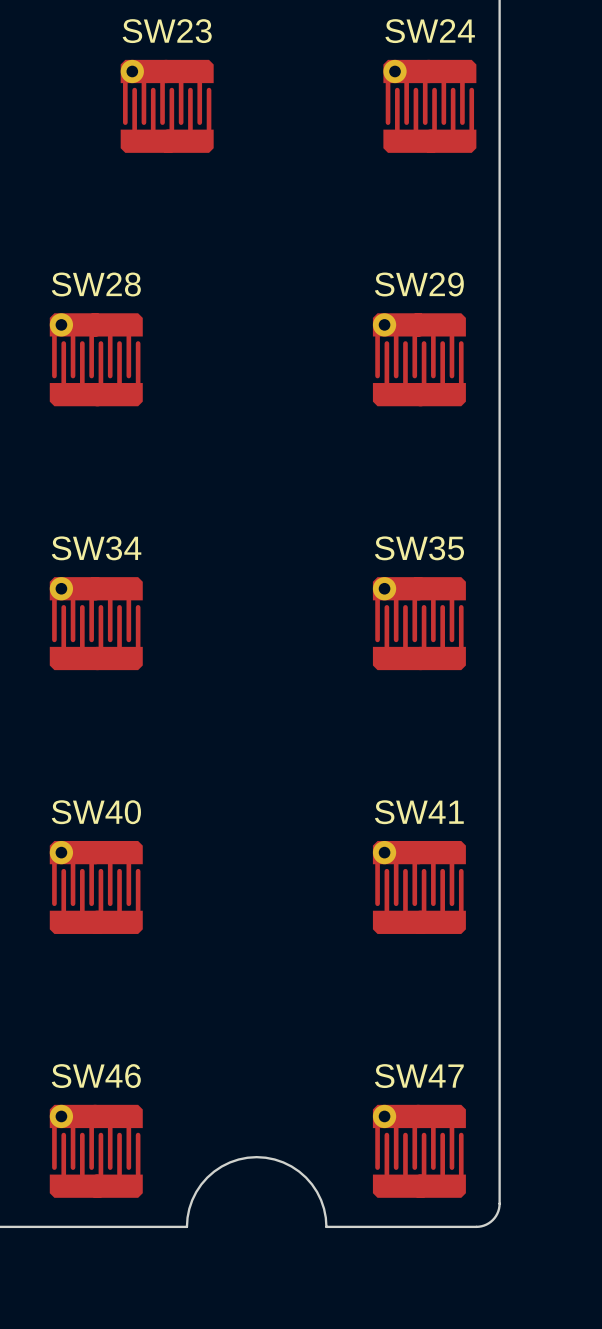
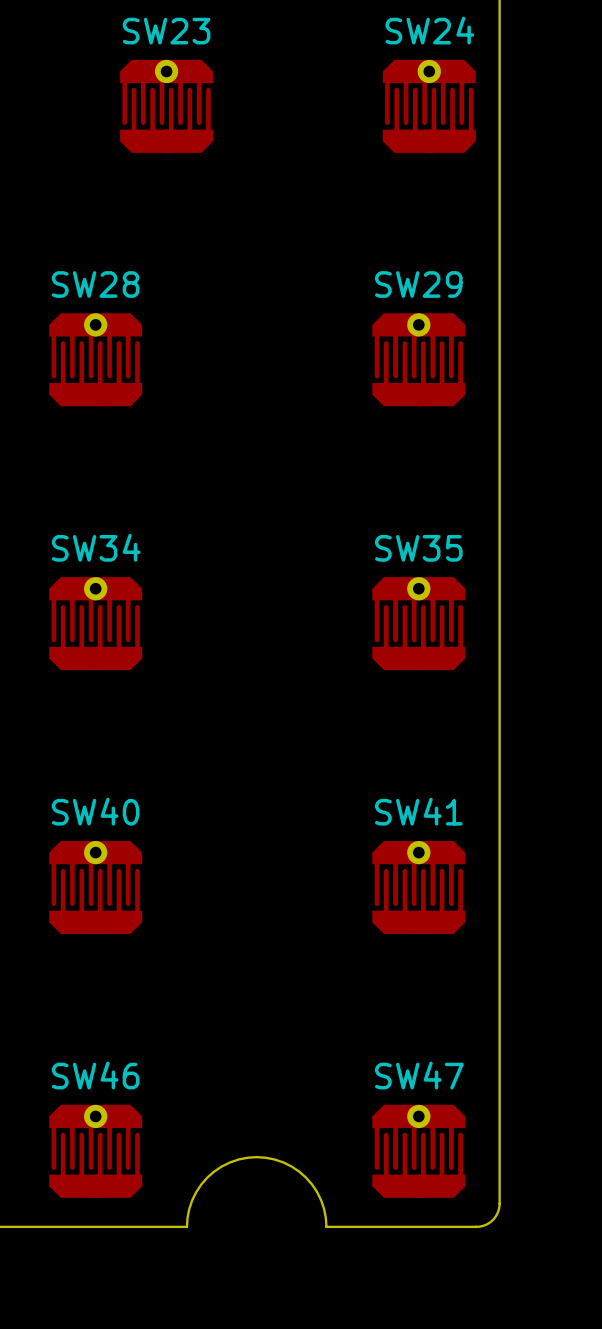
SW23 footprint: [120, 59, 214, 153] -> [120, 59, 214, 153]
SW24 footprint: [383, 59, 477, 153] -> [382, 59, 476, 153]
SW28 footprint: [49, 313, 143, 407] -> [49, 313, 143, 407]
SW29 footprint: [372, 313, 466, 407] -> [372, 313, 466, 407]
SW34 footprint: [49, 577, 143, 671] -> [49, 577, 143, 671]
SW35 footprint: [372, 577, 466, 671] -> [372, 577, 466, 671]
SW40 footprint: [49, 840, 143, 934] -> [49, 840, 143, 934]
SW41 footprint: [372, 840, 466, 934] -> [372, 840, 466, 934]
SW46 footprint: [49, 1104, 143, 1198] -> [49, 1104, 143, 1198]
SW47 footprint: [372, 1104, 466, 1198] -> [372, 1104, 466, 1198]

